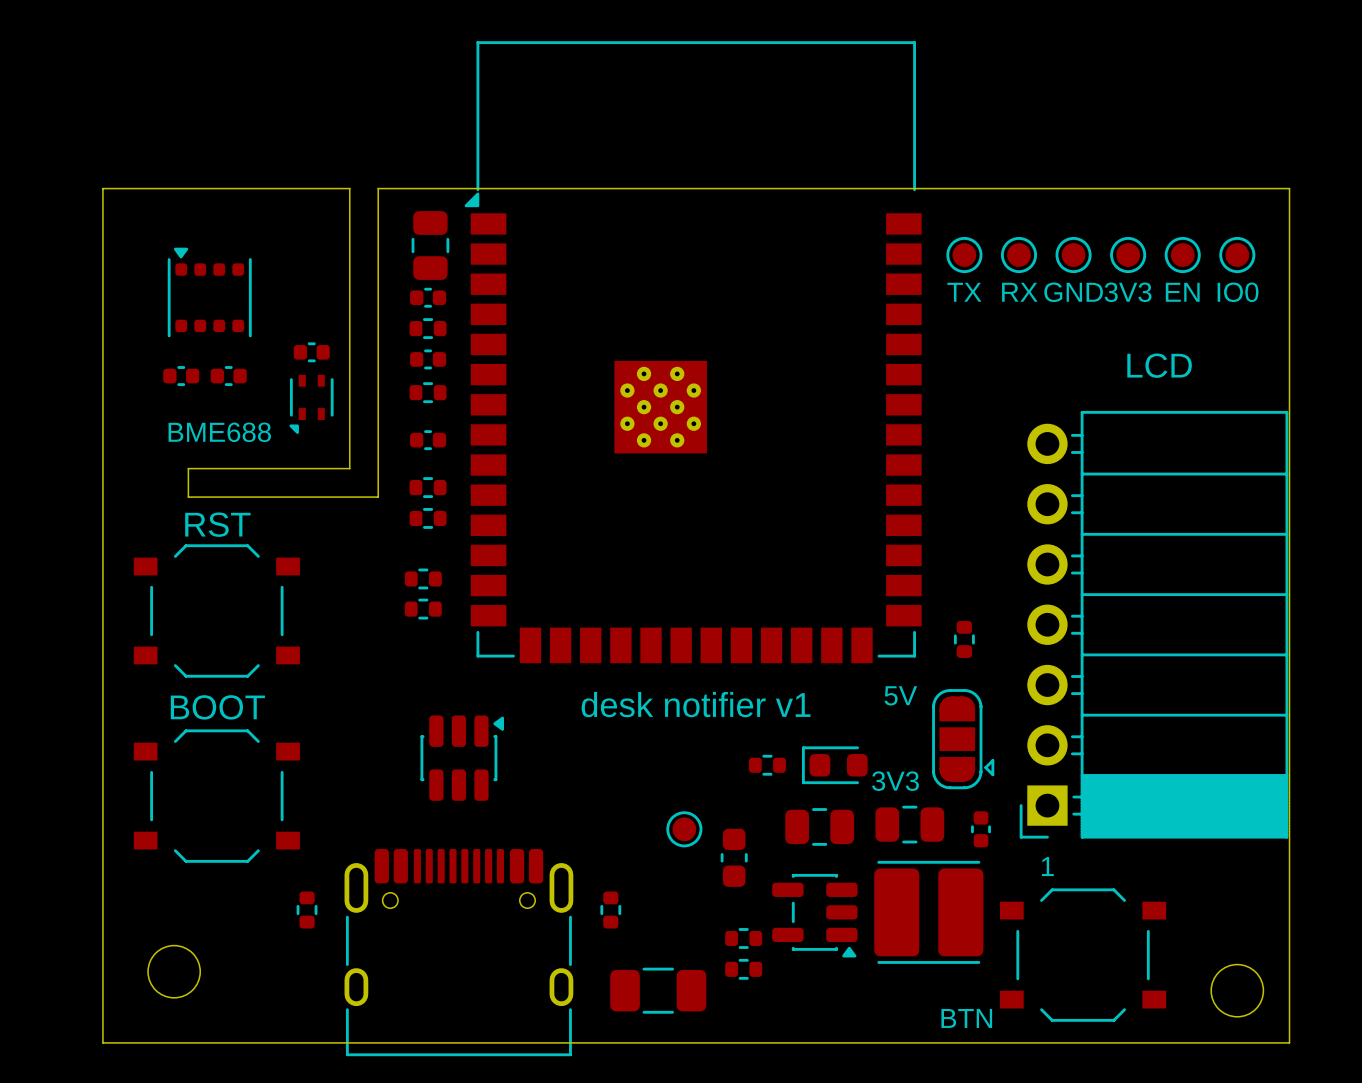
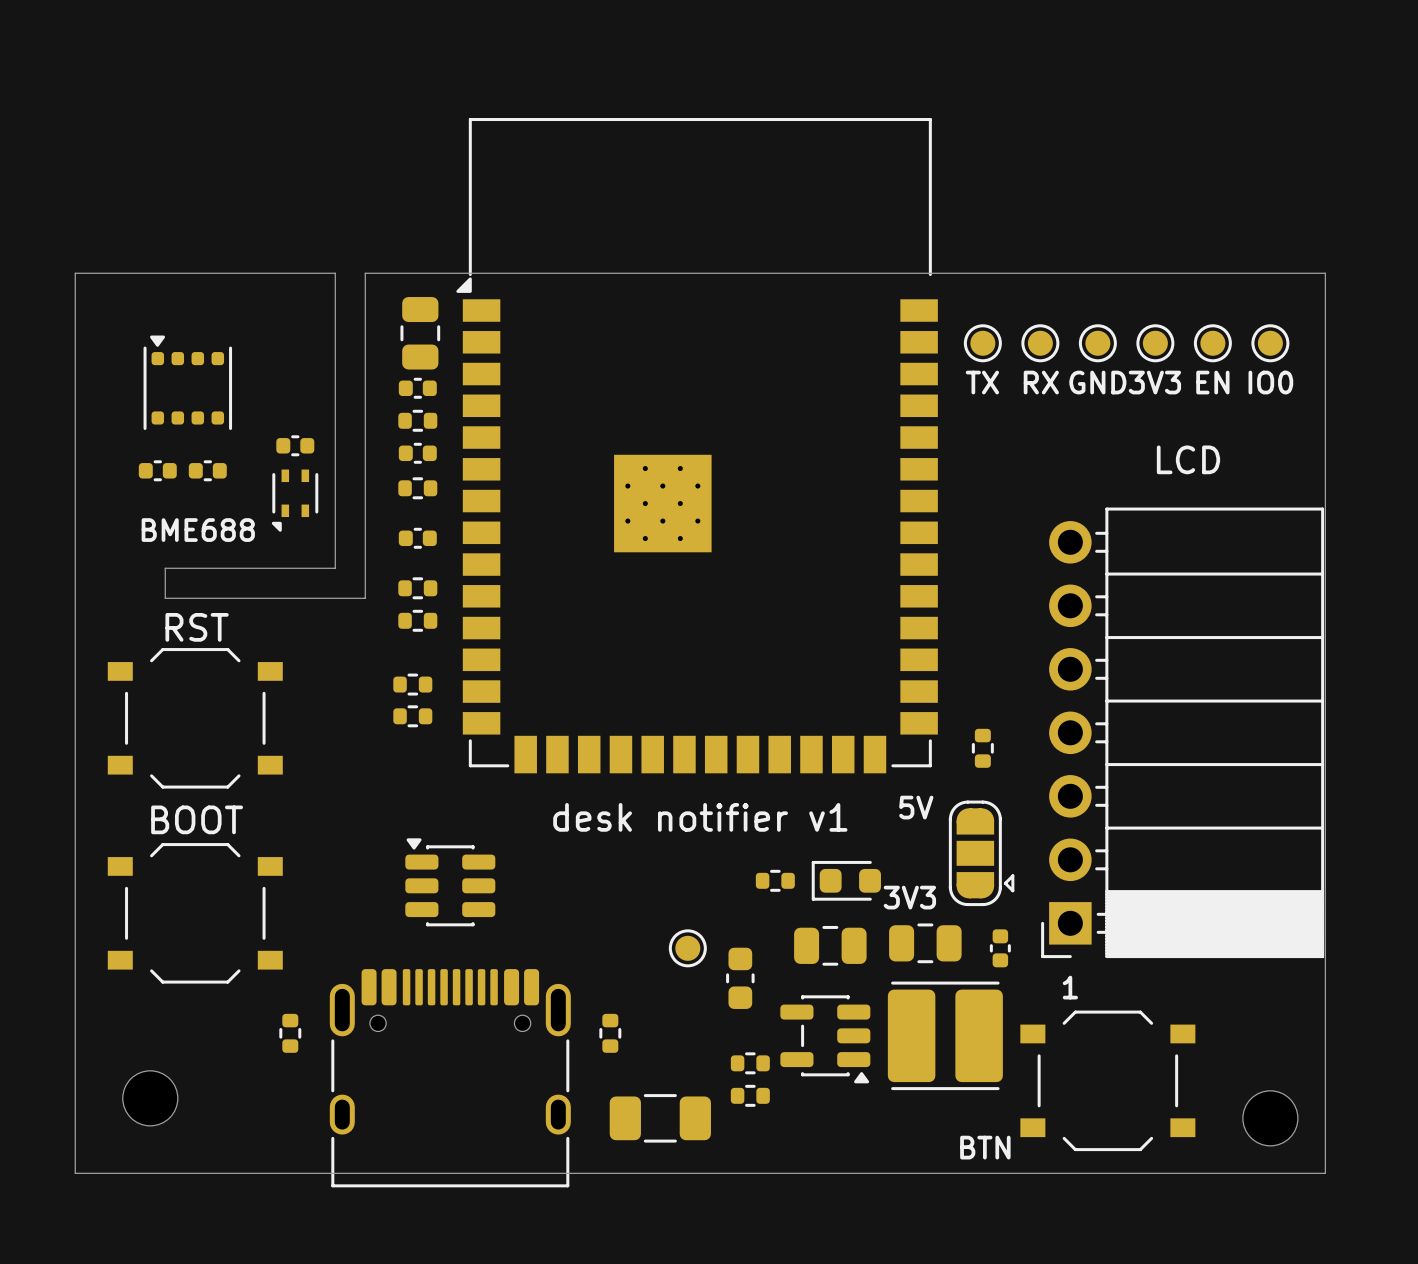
part rotation: 0° (462, 758) -> 90° counterclockwise (450, 882)

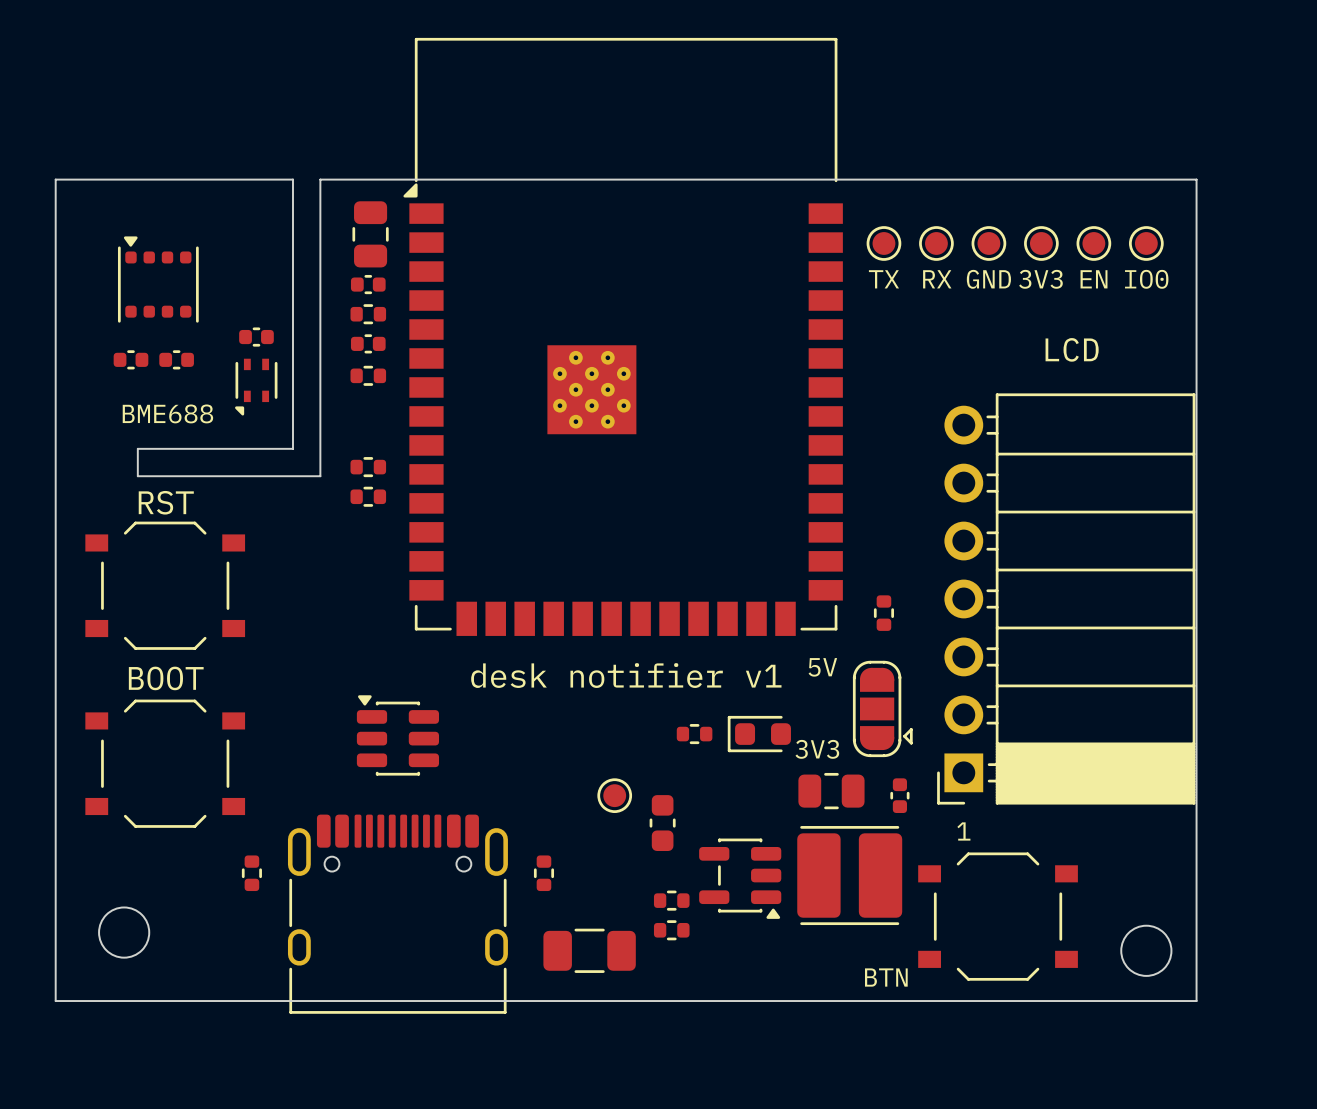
part: (417, 538) -> none
part: (412, 684) -> none
part: (412, 716) -> none
part: (830, 945) -> none

